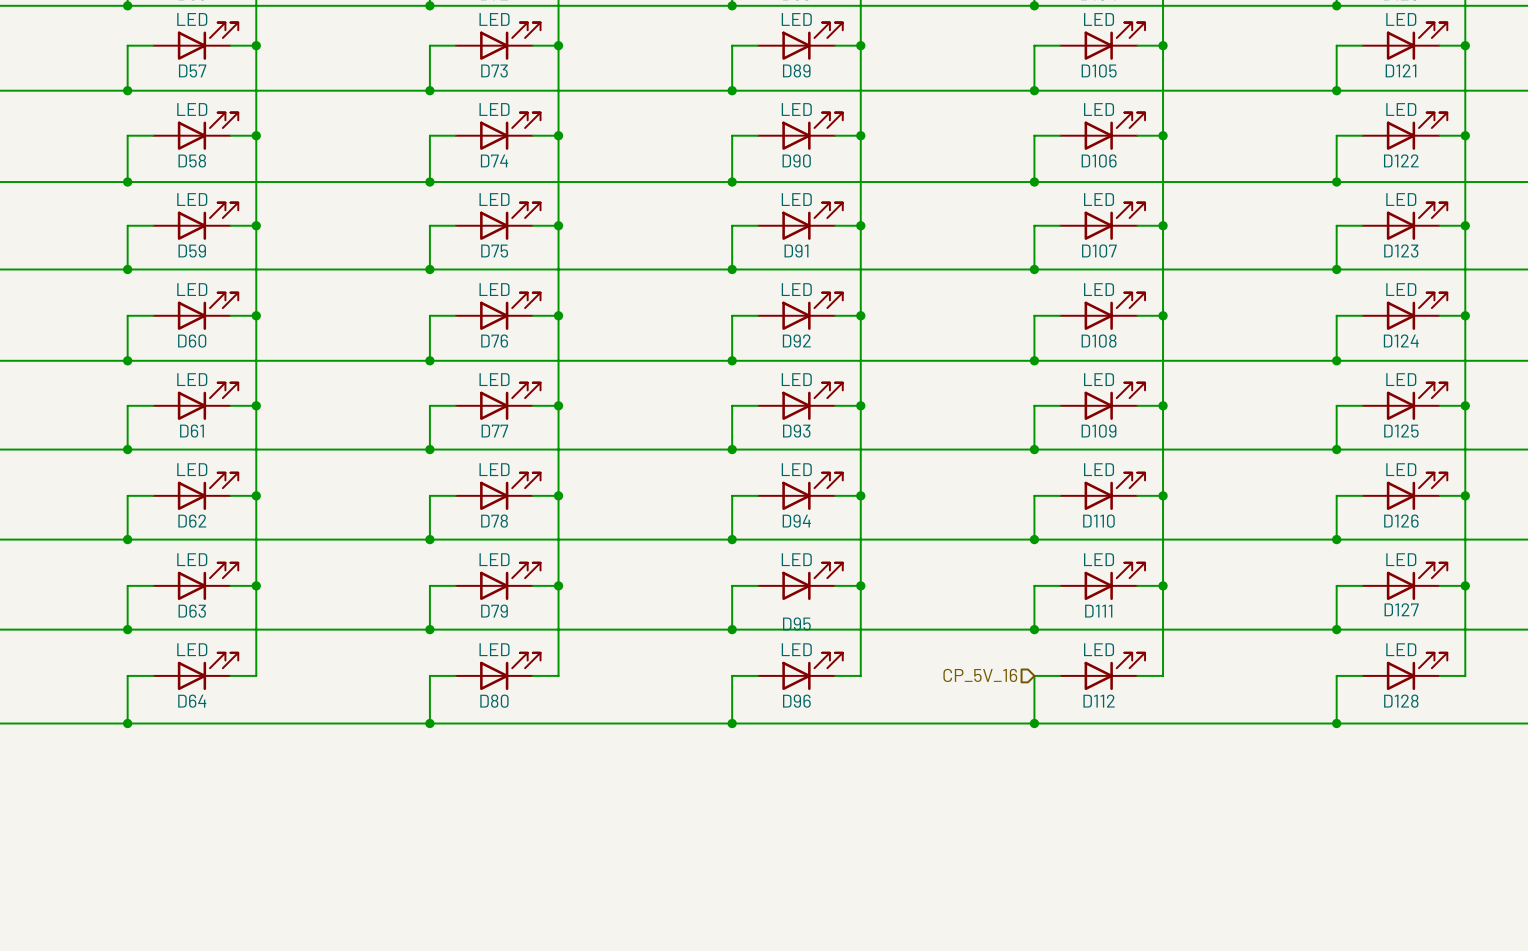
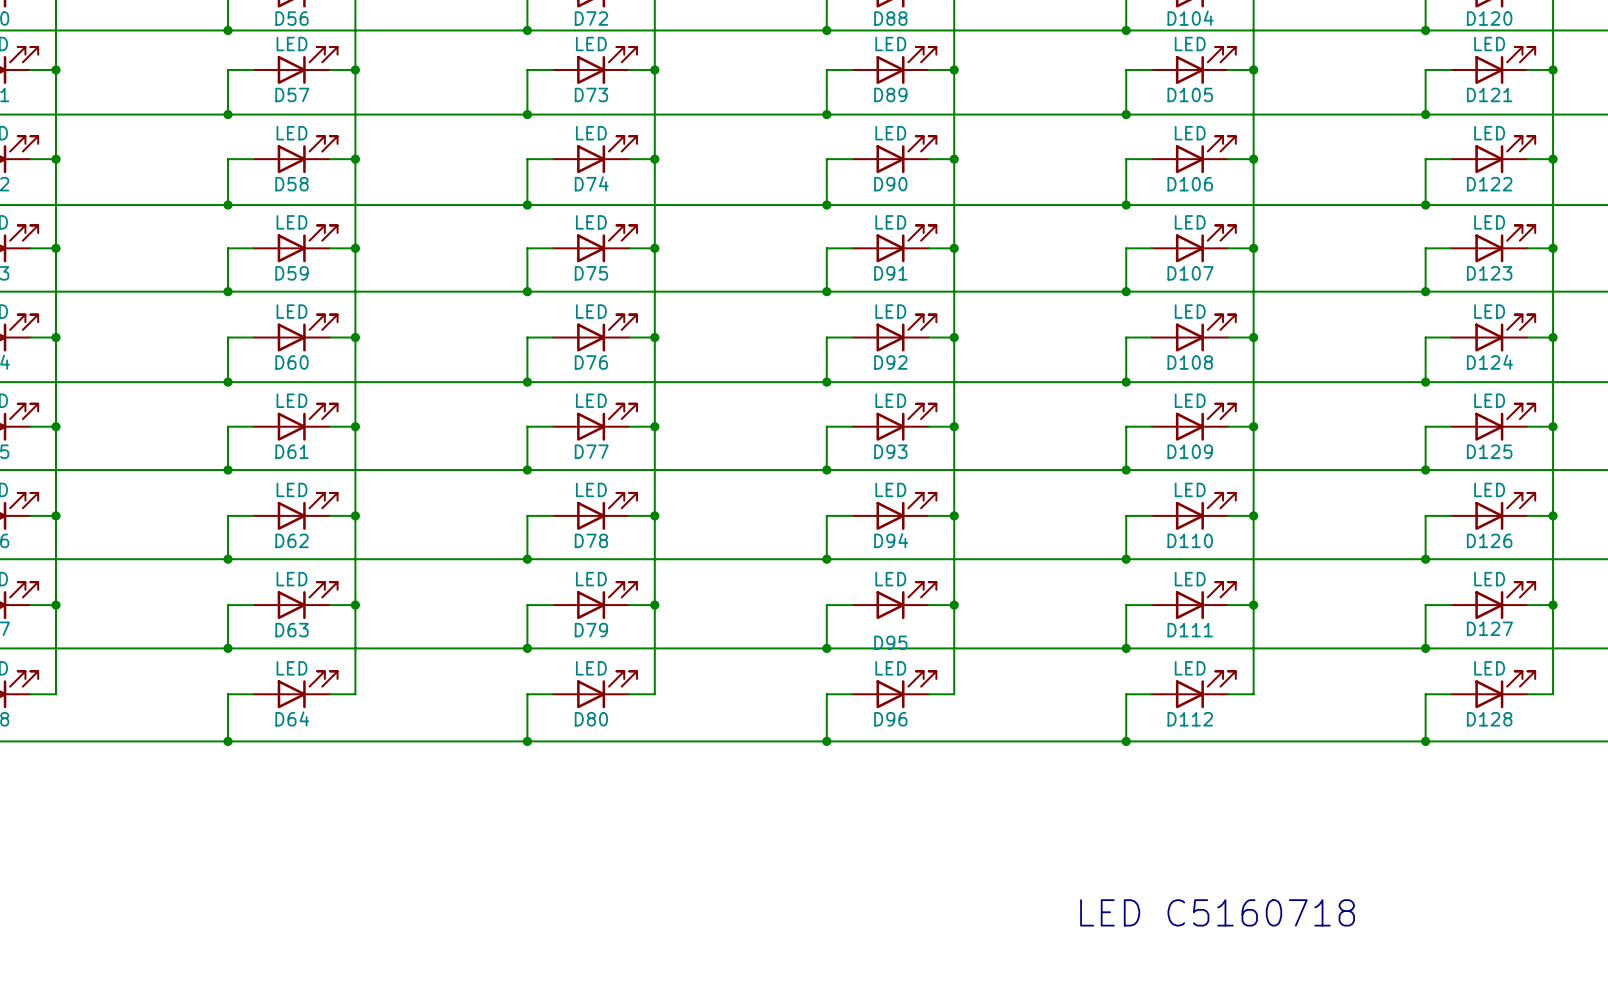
hierarchical label: CP_5V_16 (980, 675) -> none
text: none -> LED C5160718 (1217, 912)

